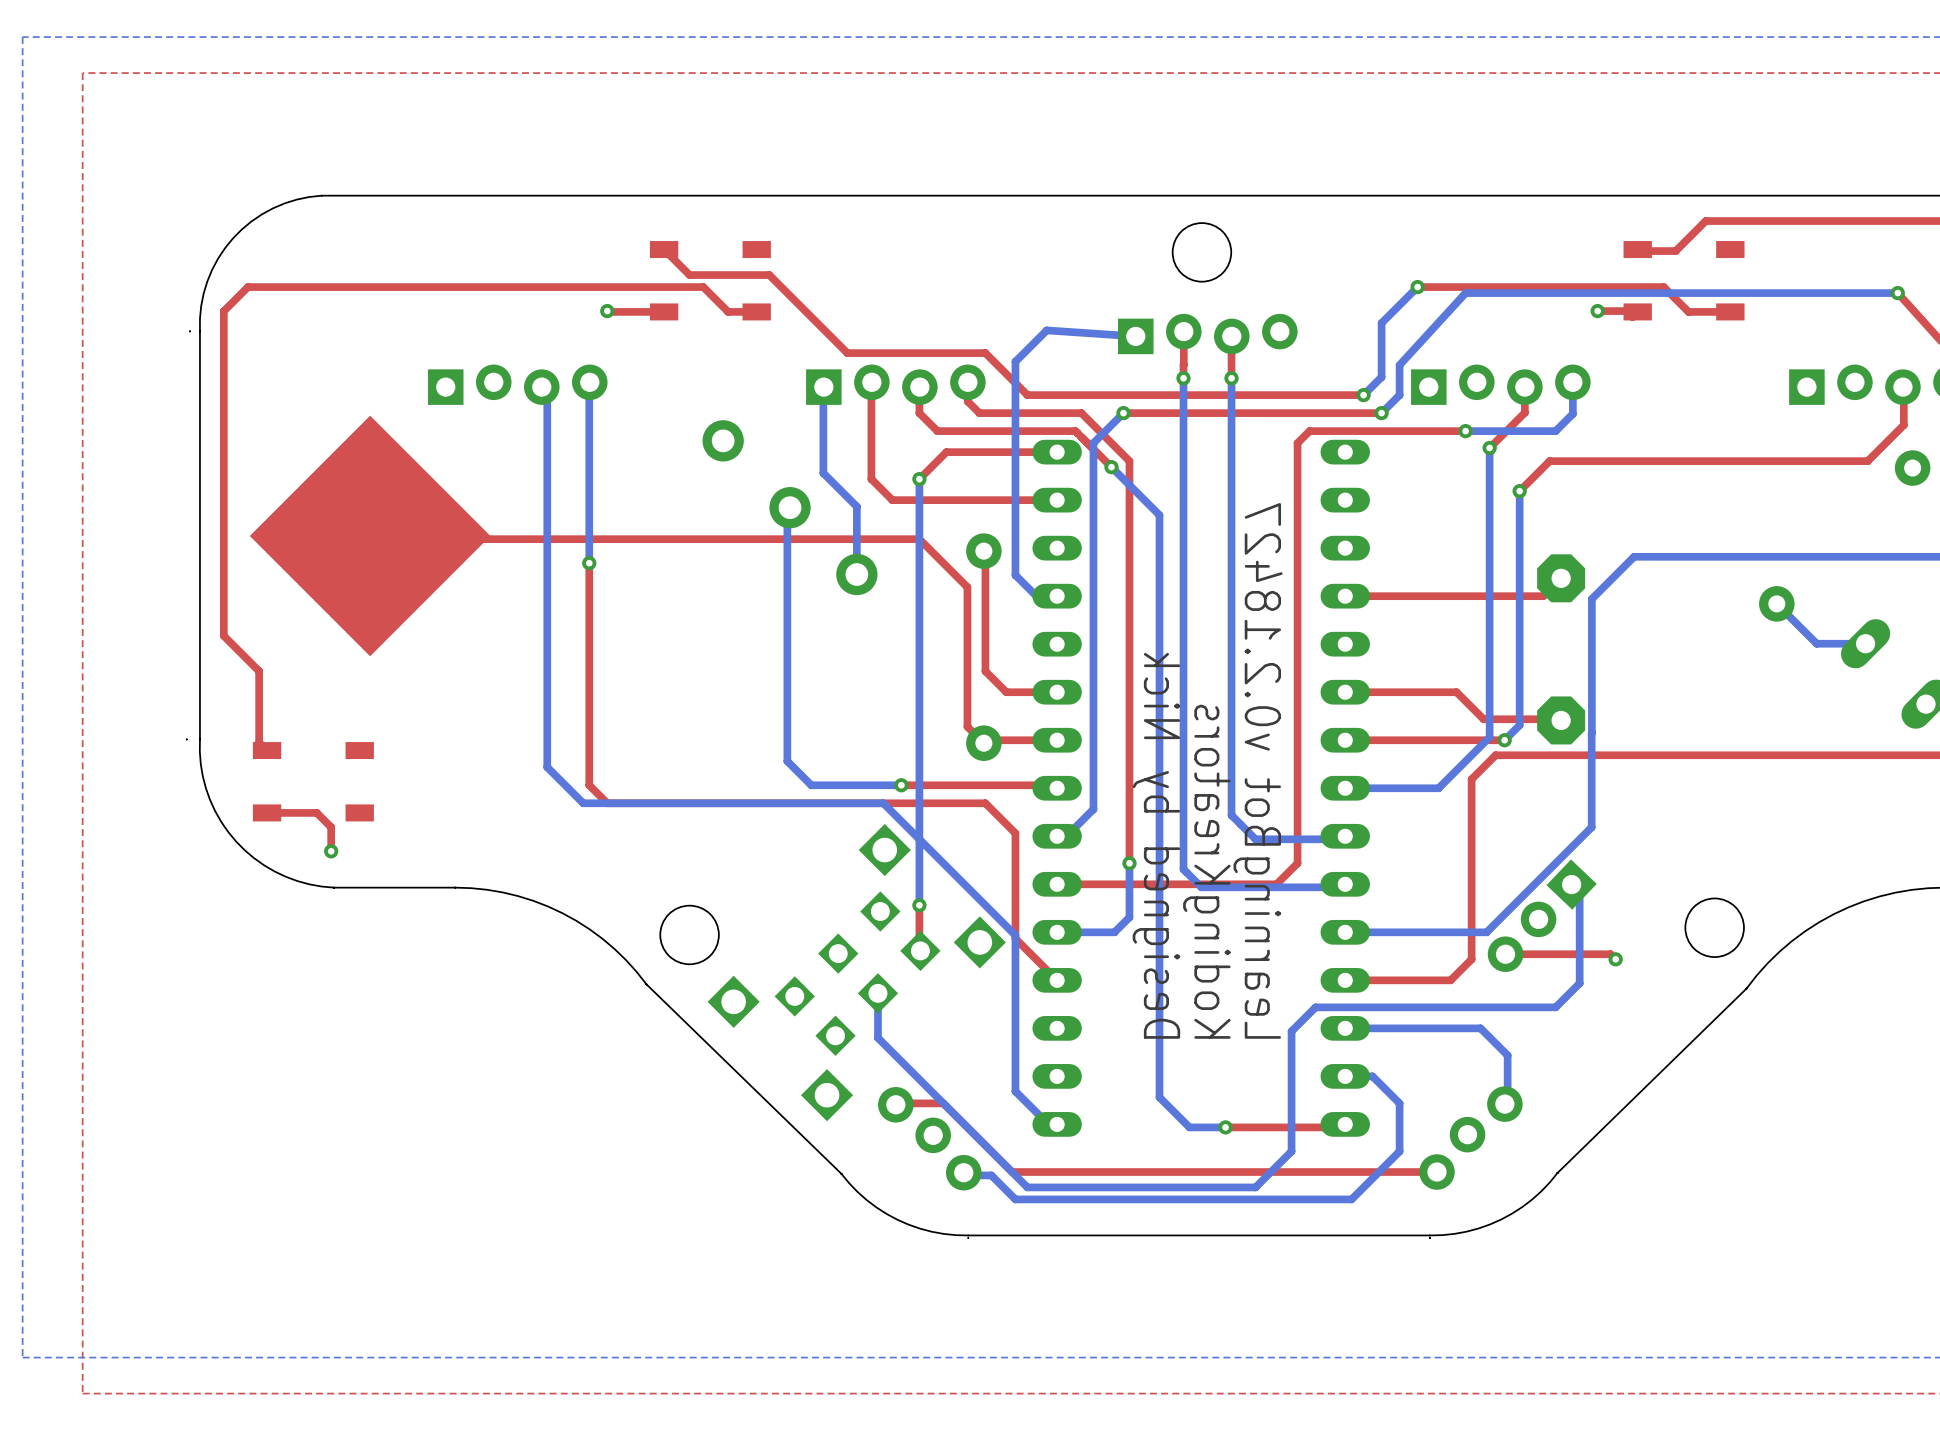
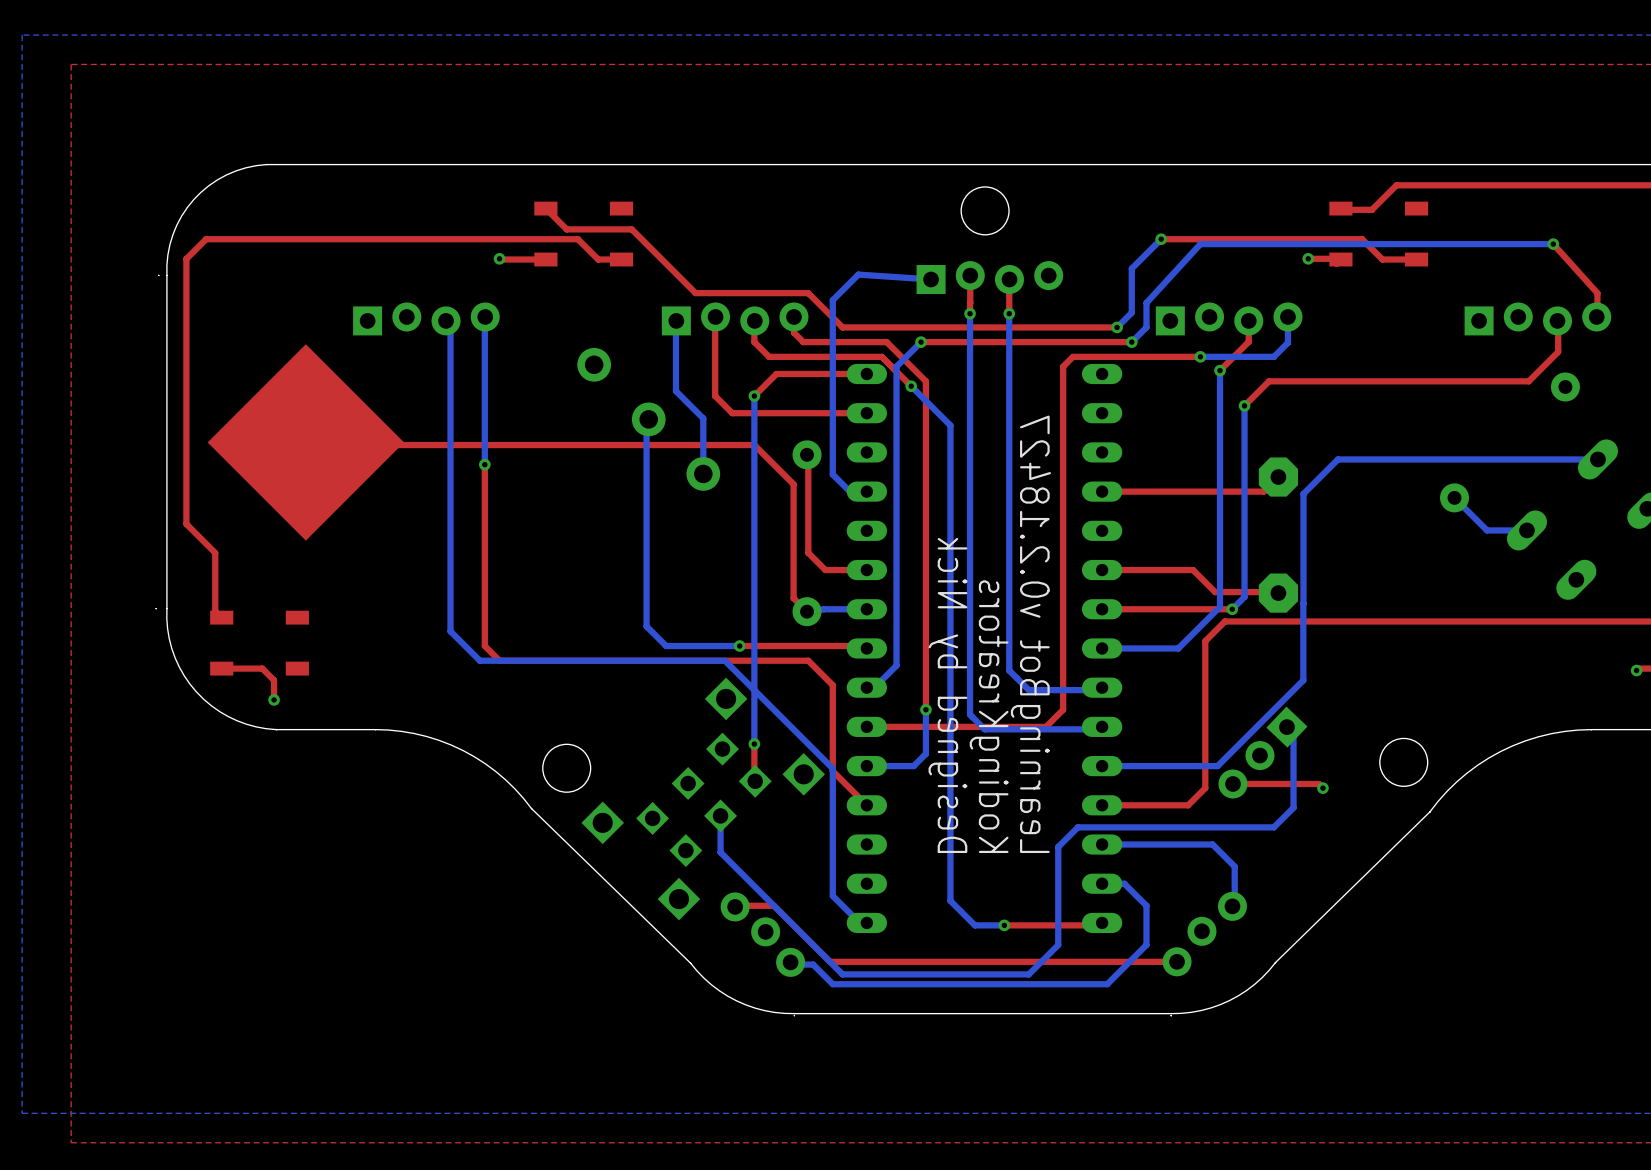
bottom track: none -> (866, 609) (824, 609) (807, 611)
top track: (1057, 740) (986, 740) (983, 743) -> none

